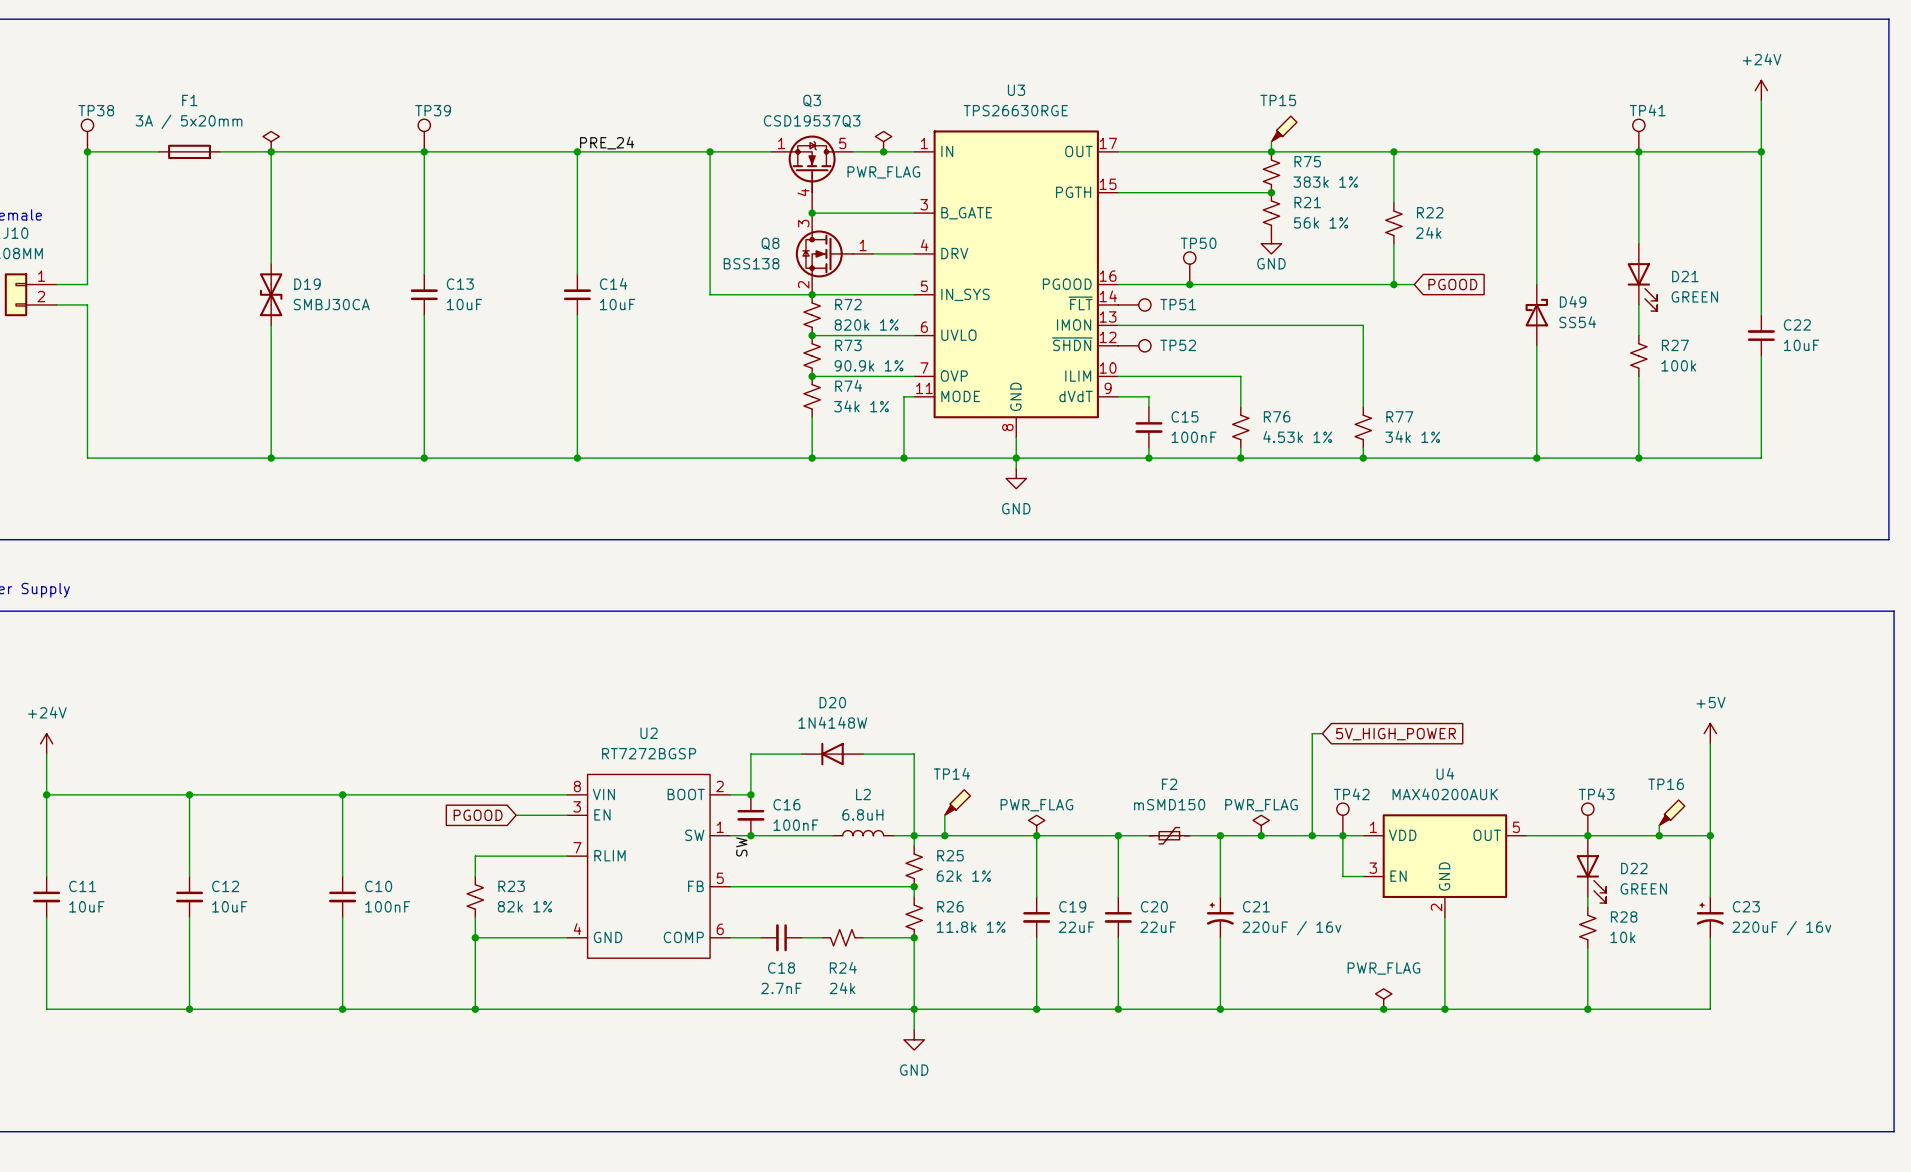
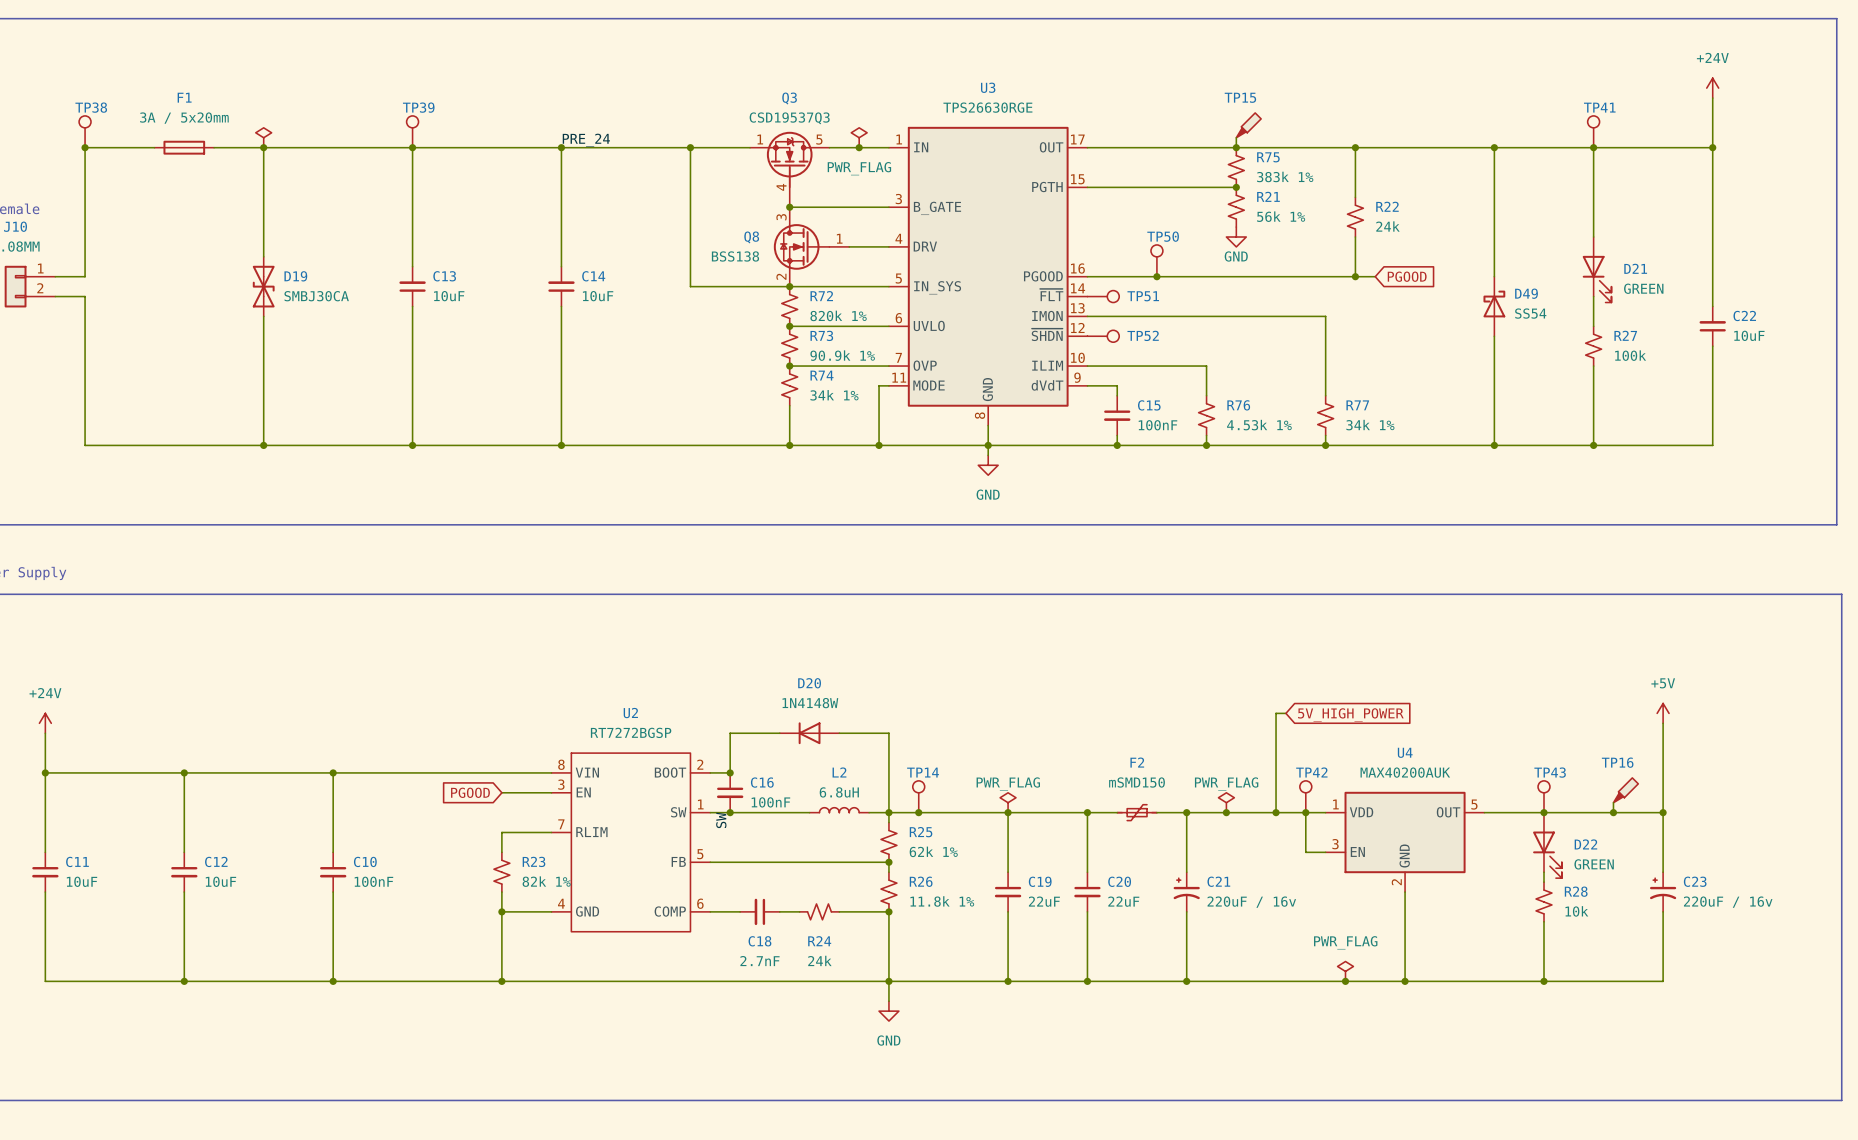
TP14 symbol: [944, 789, 971, 816] -> [912, 780, 925, 813]
wire: (516, 856) (475, 856) (475, 876) -> (501, 832) (501, 852)
R23 position: (475, 896) -> (501, 872)
wire: (475, 917) (475, 1009) -> (501, 892) (501, 981)
wire: (475, 937) (516, 937) -> none
junction position: (475, 937) -> (501, 911)
junction position: (475, 1009) -> (501, 981)

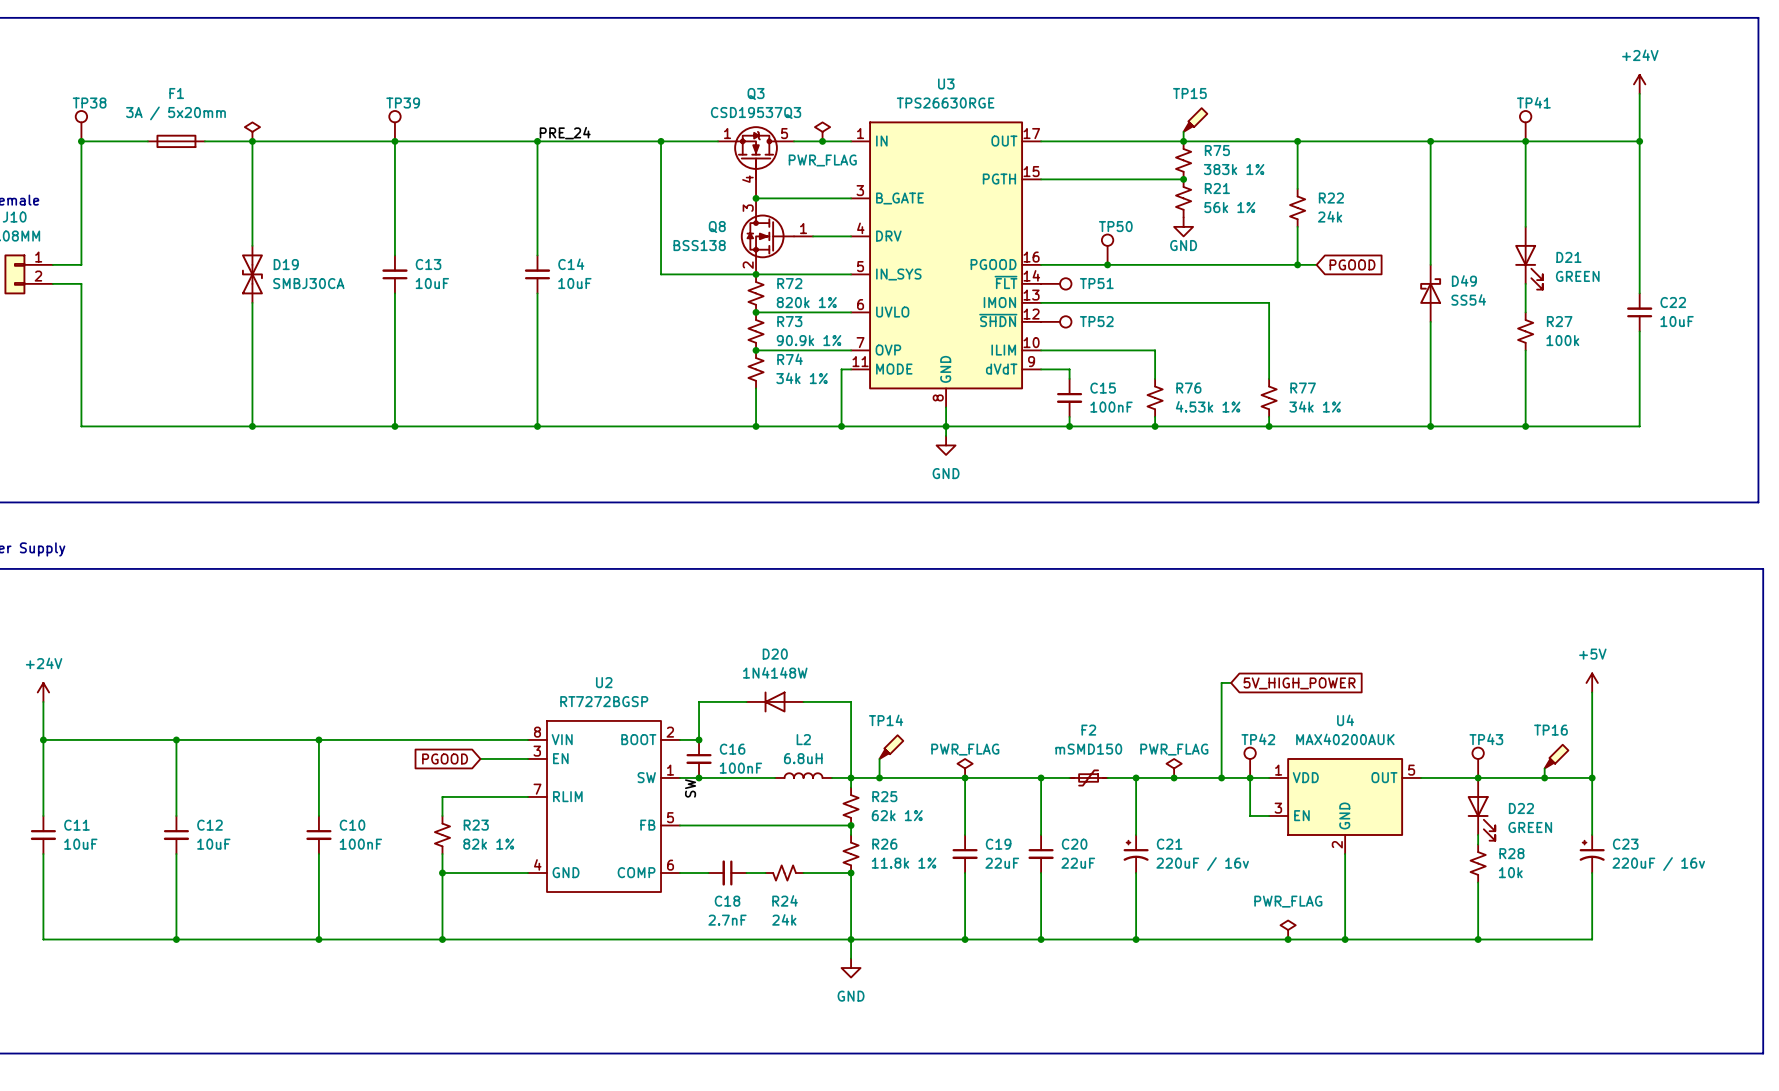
TP14 symbol: [912, 780, 925, 813] -> [879, 735, 904, 759]
wire: (501, 832) (501, 852) -> (480, 796) (442, 796) (442, 815)
R23 position: (501, 872) -> (442, 834)
wire: (501, 892) (501, 981) -> (442, 854) (442, 939)
wire: none -> (442, 873) (480, 873)
junction position: (501, 911) -> (442, 873)
junction position: (501, 981) -> (442, 939)

